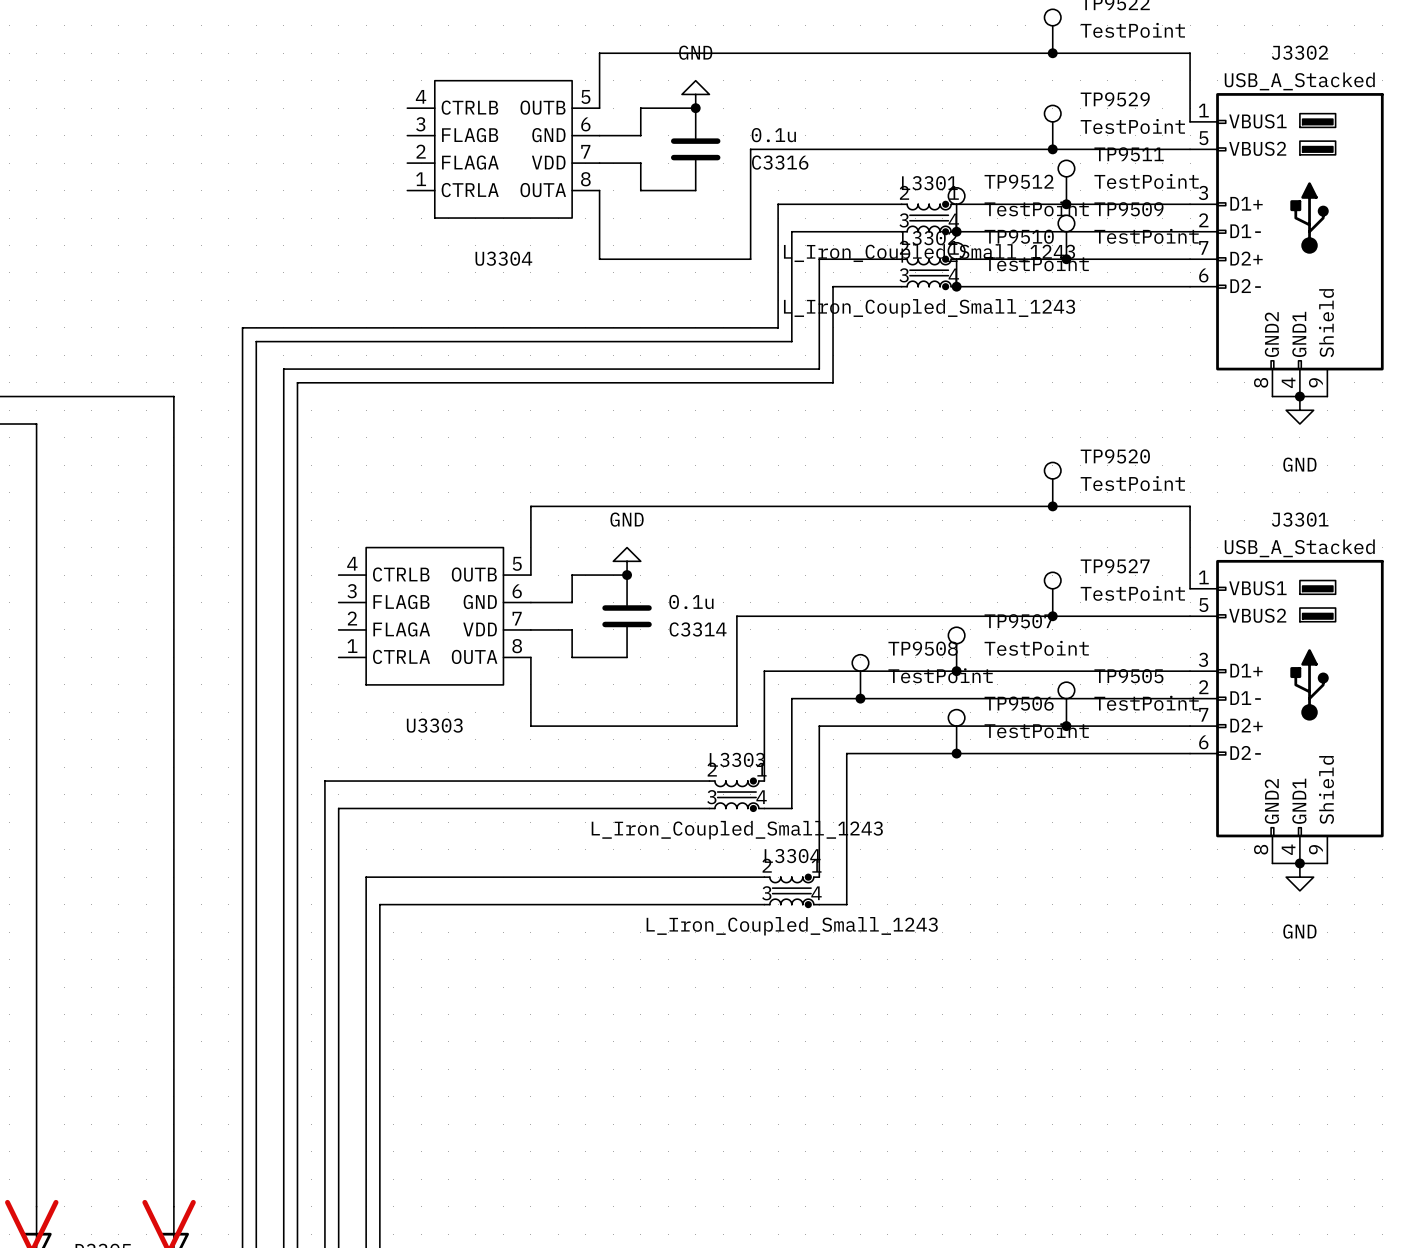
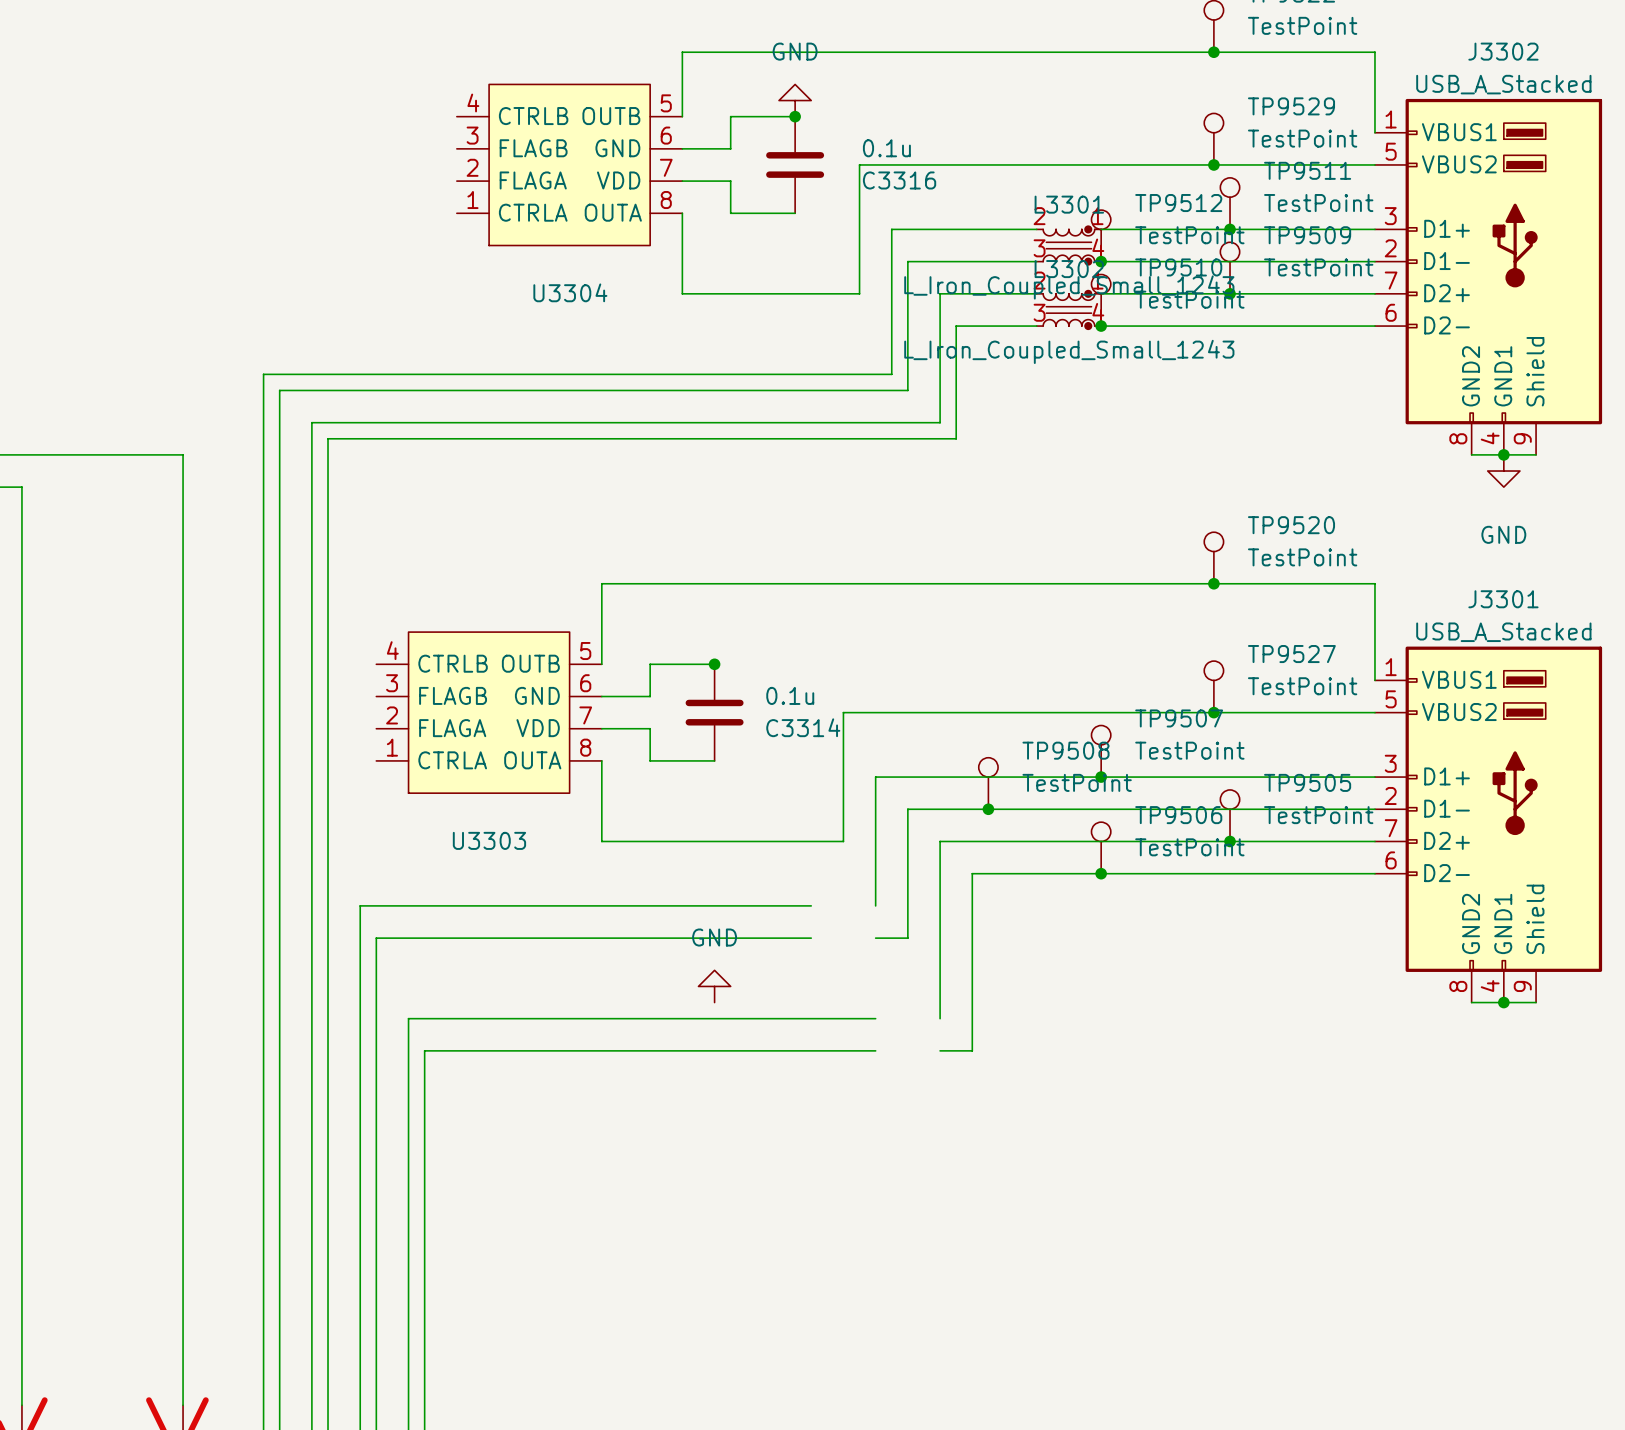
power symbol: GND (627, 561) -> none
L3303: L_Iron_Coupled_Small_1243 (736, 794) -> none
power symbol: none -> GND (714, 986)
power symbol: GND (1299, 877) -> none
L3304: L_Iron_Coupled_Small_1243 (791, 890) -> none

